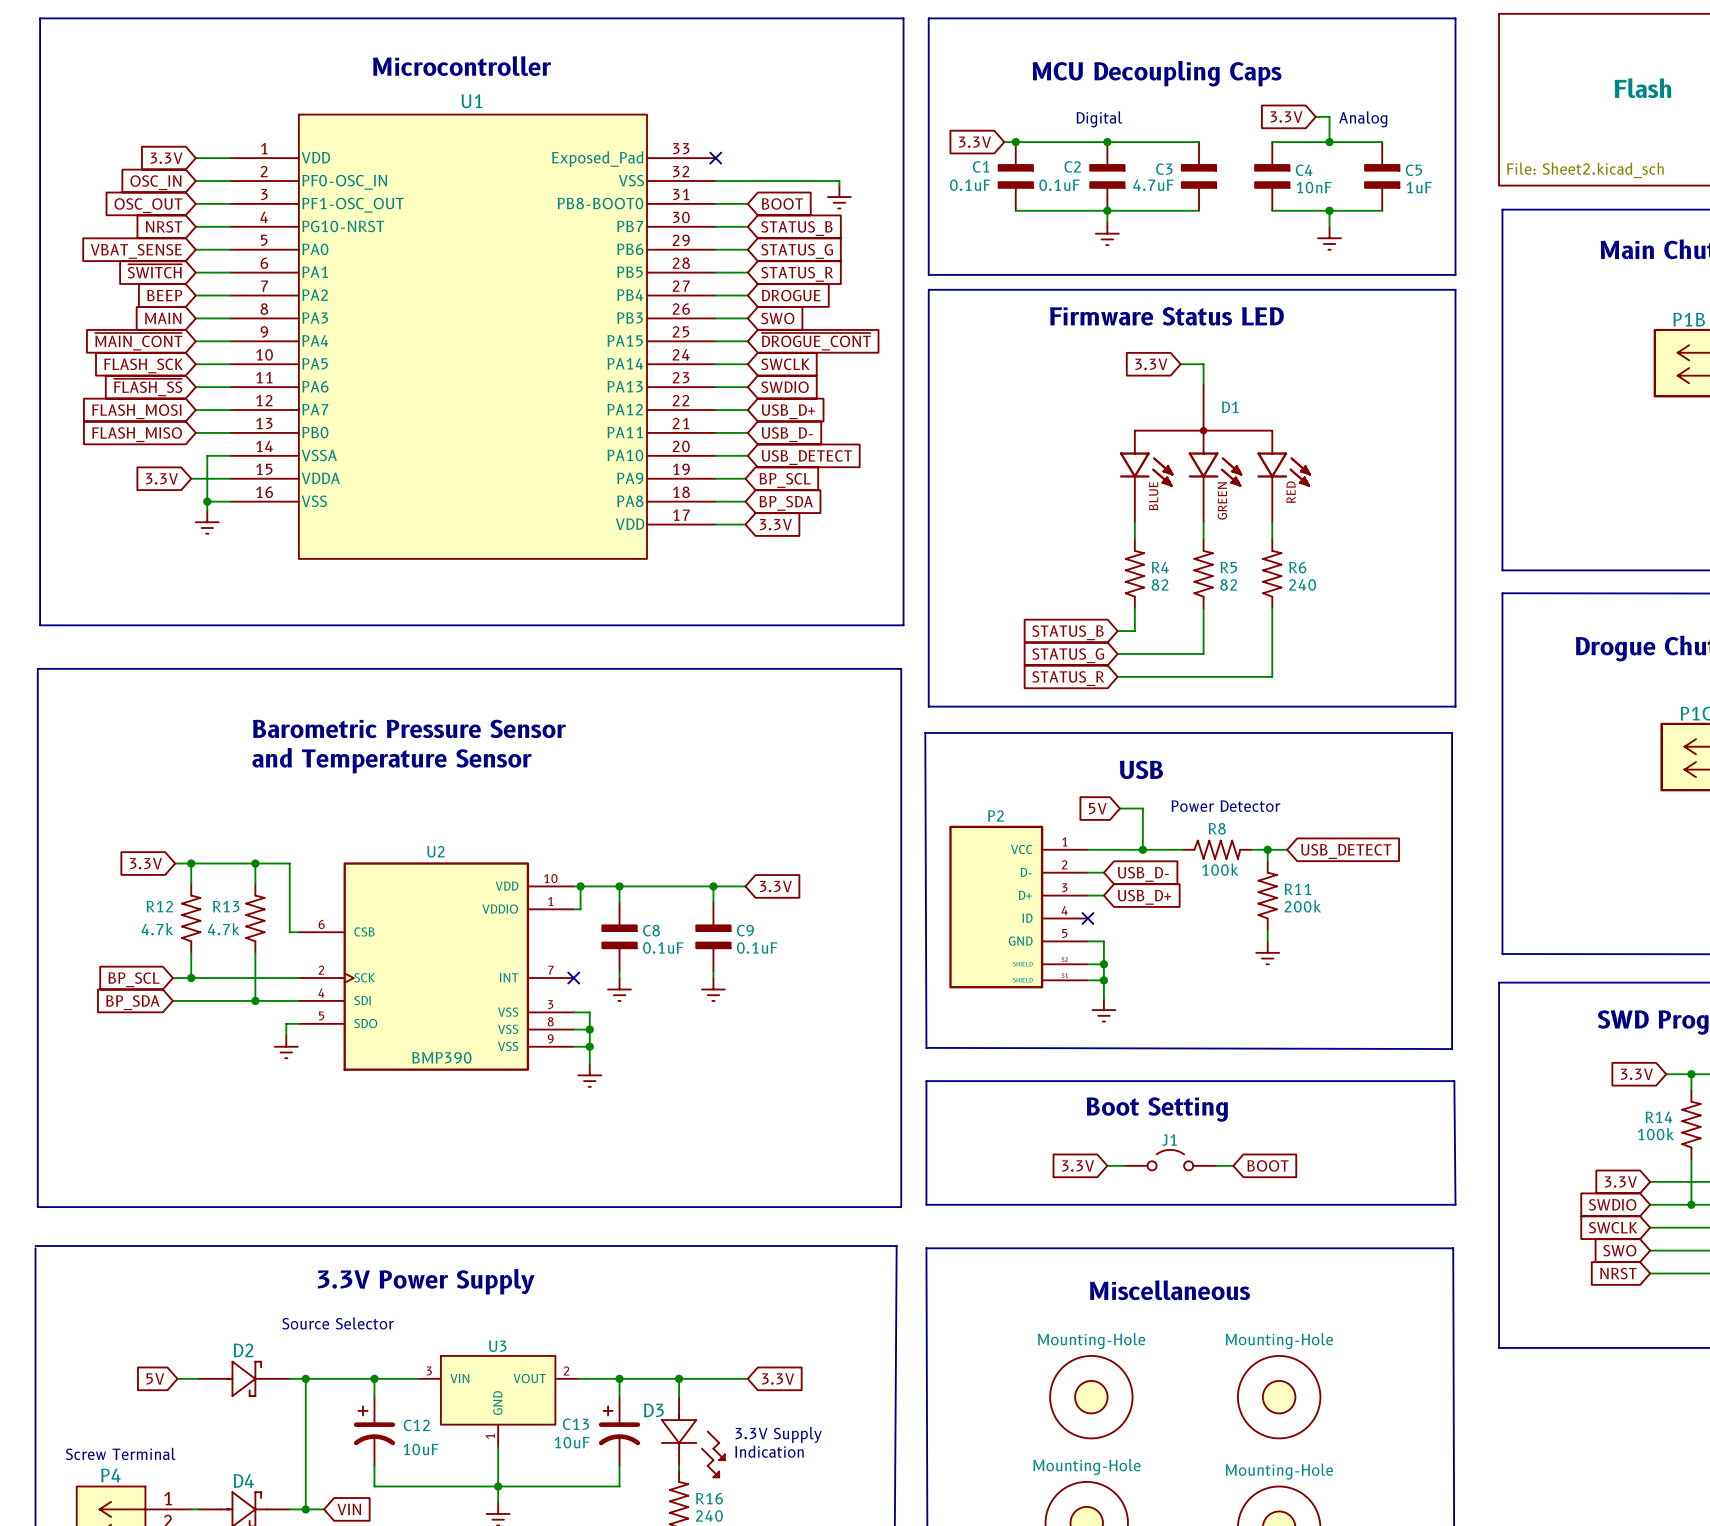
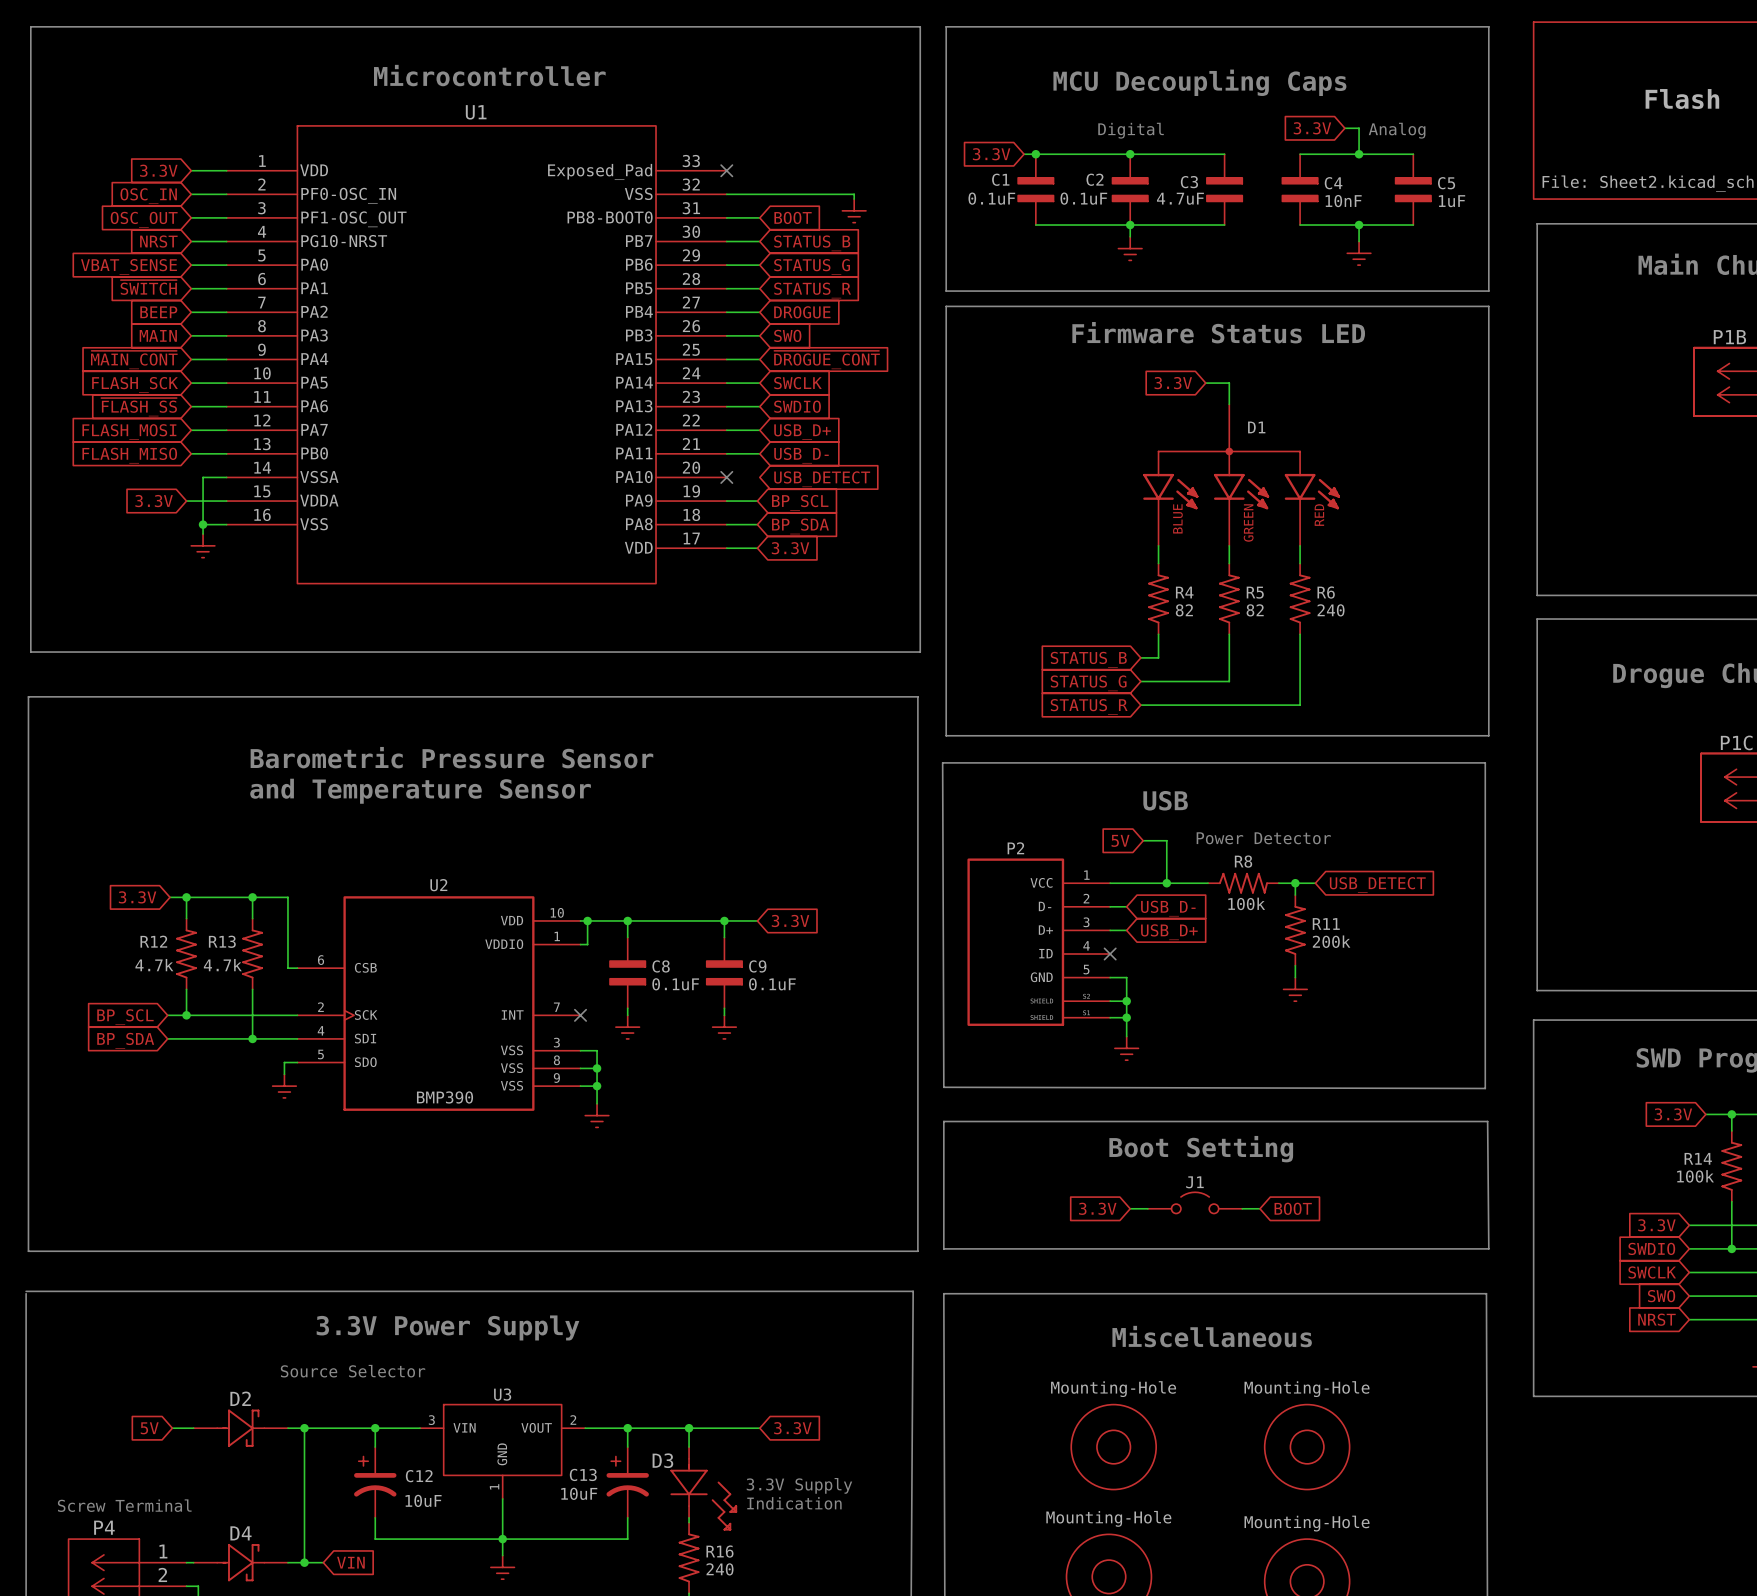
wire: (715, 455) (747, 455) -> none
no-connect mark: none -> (726, 477)

